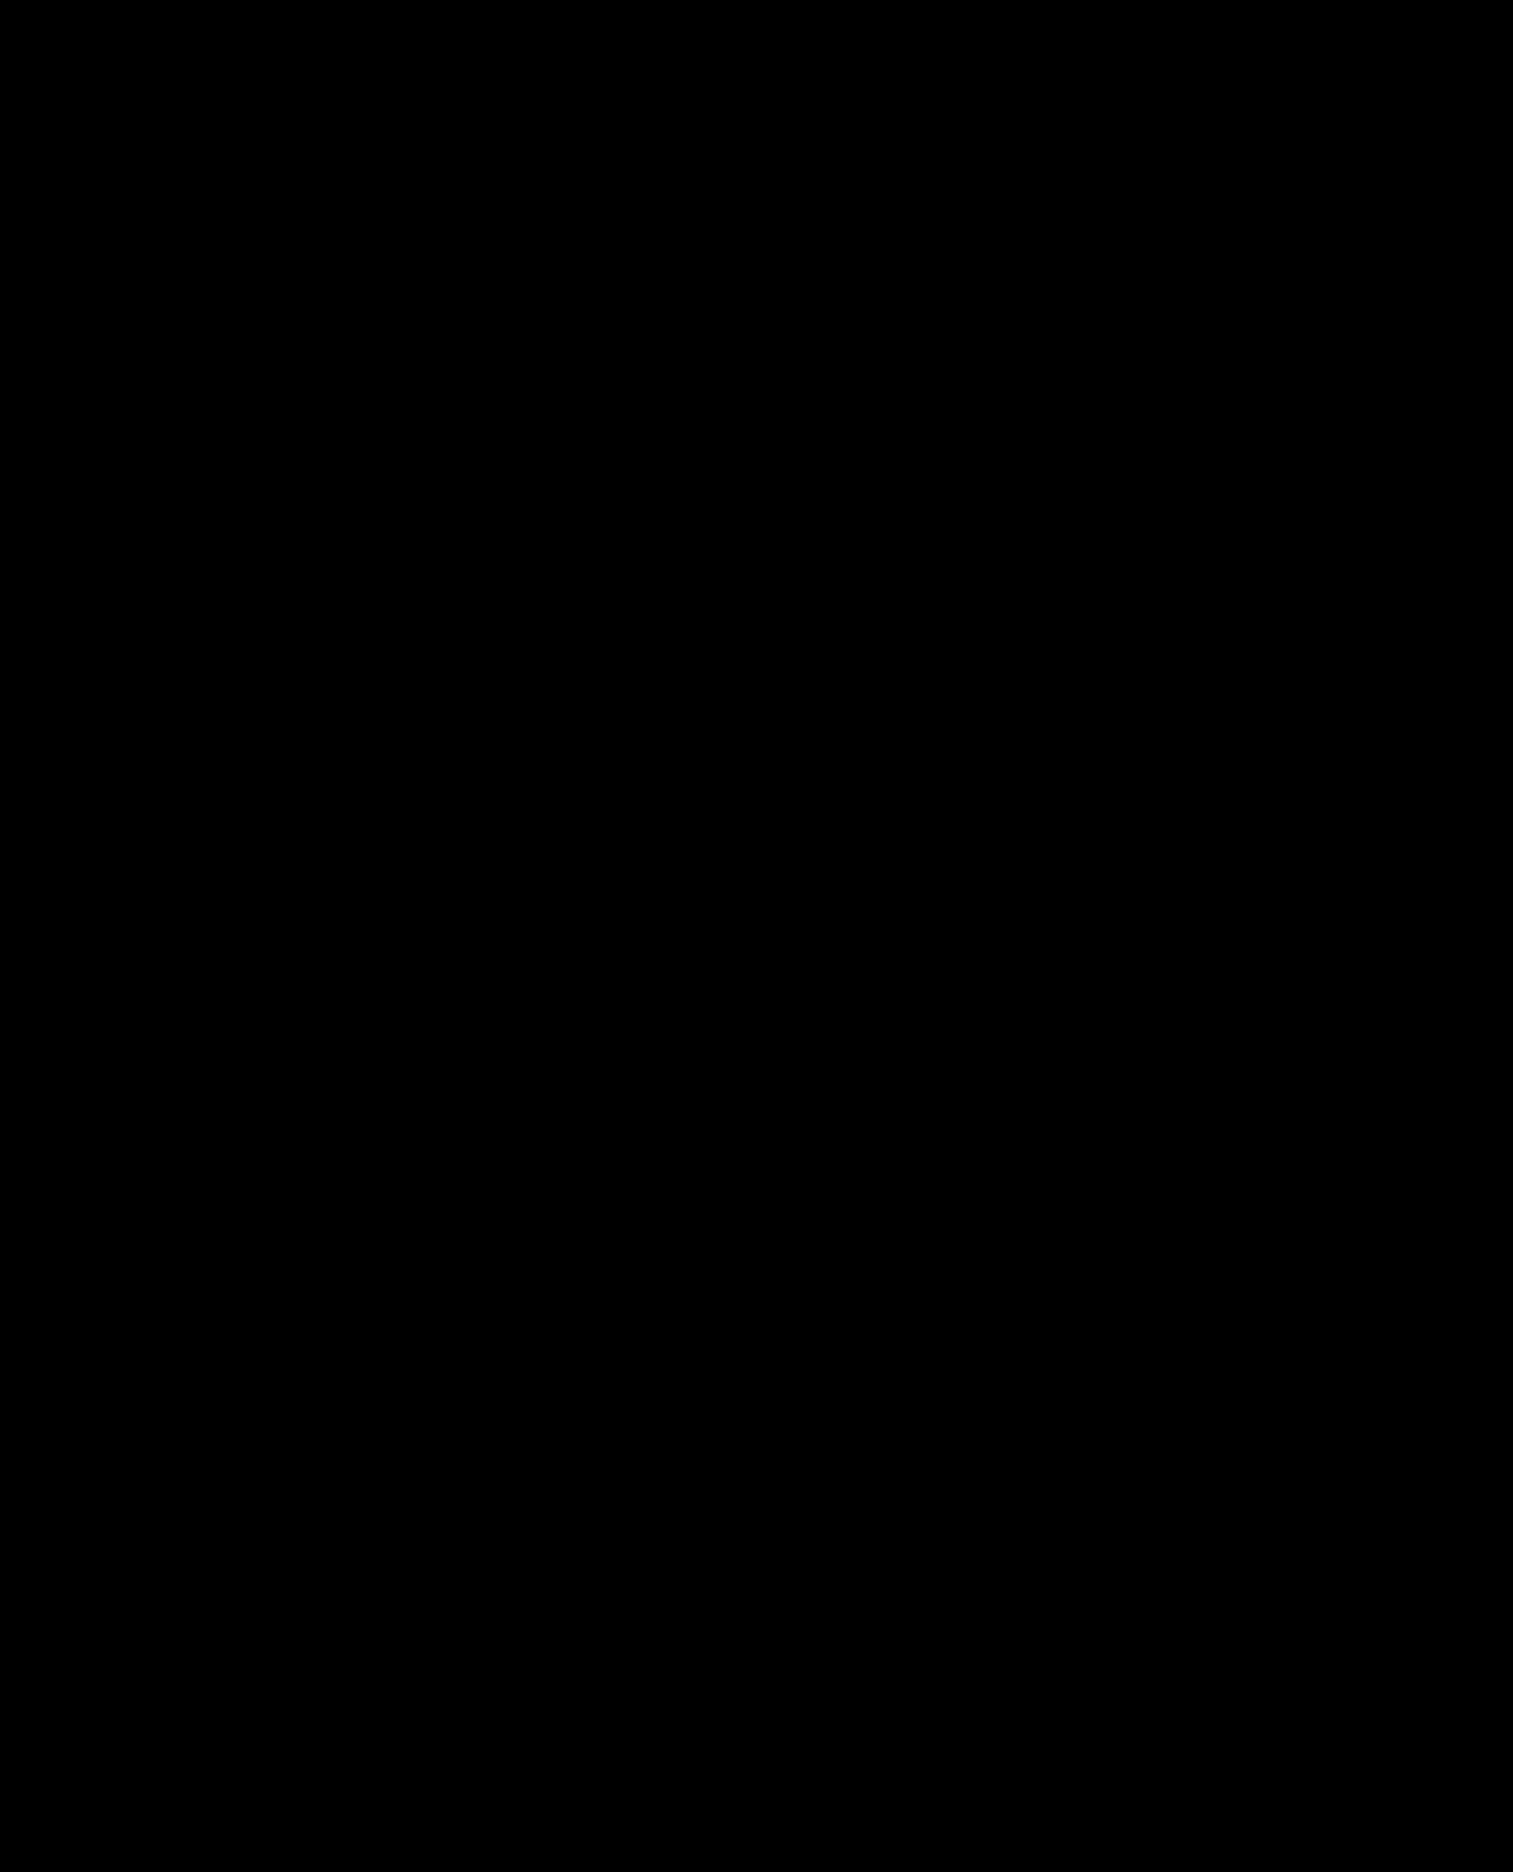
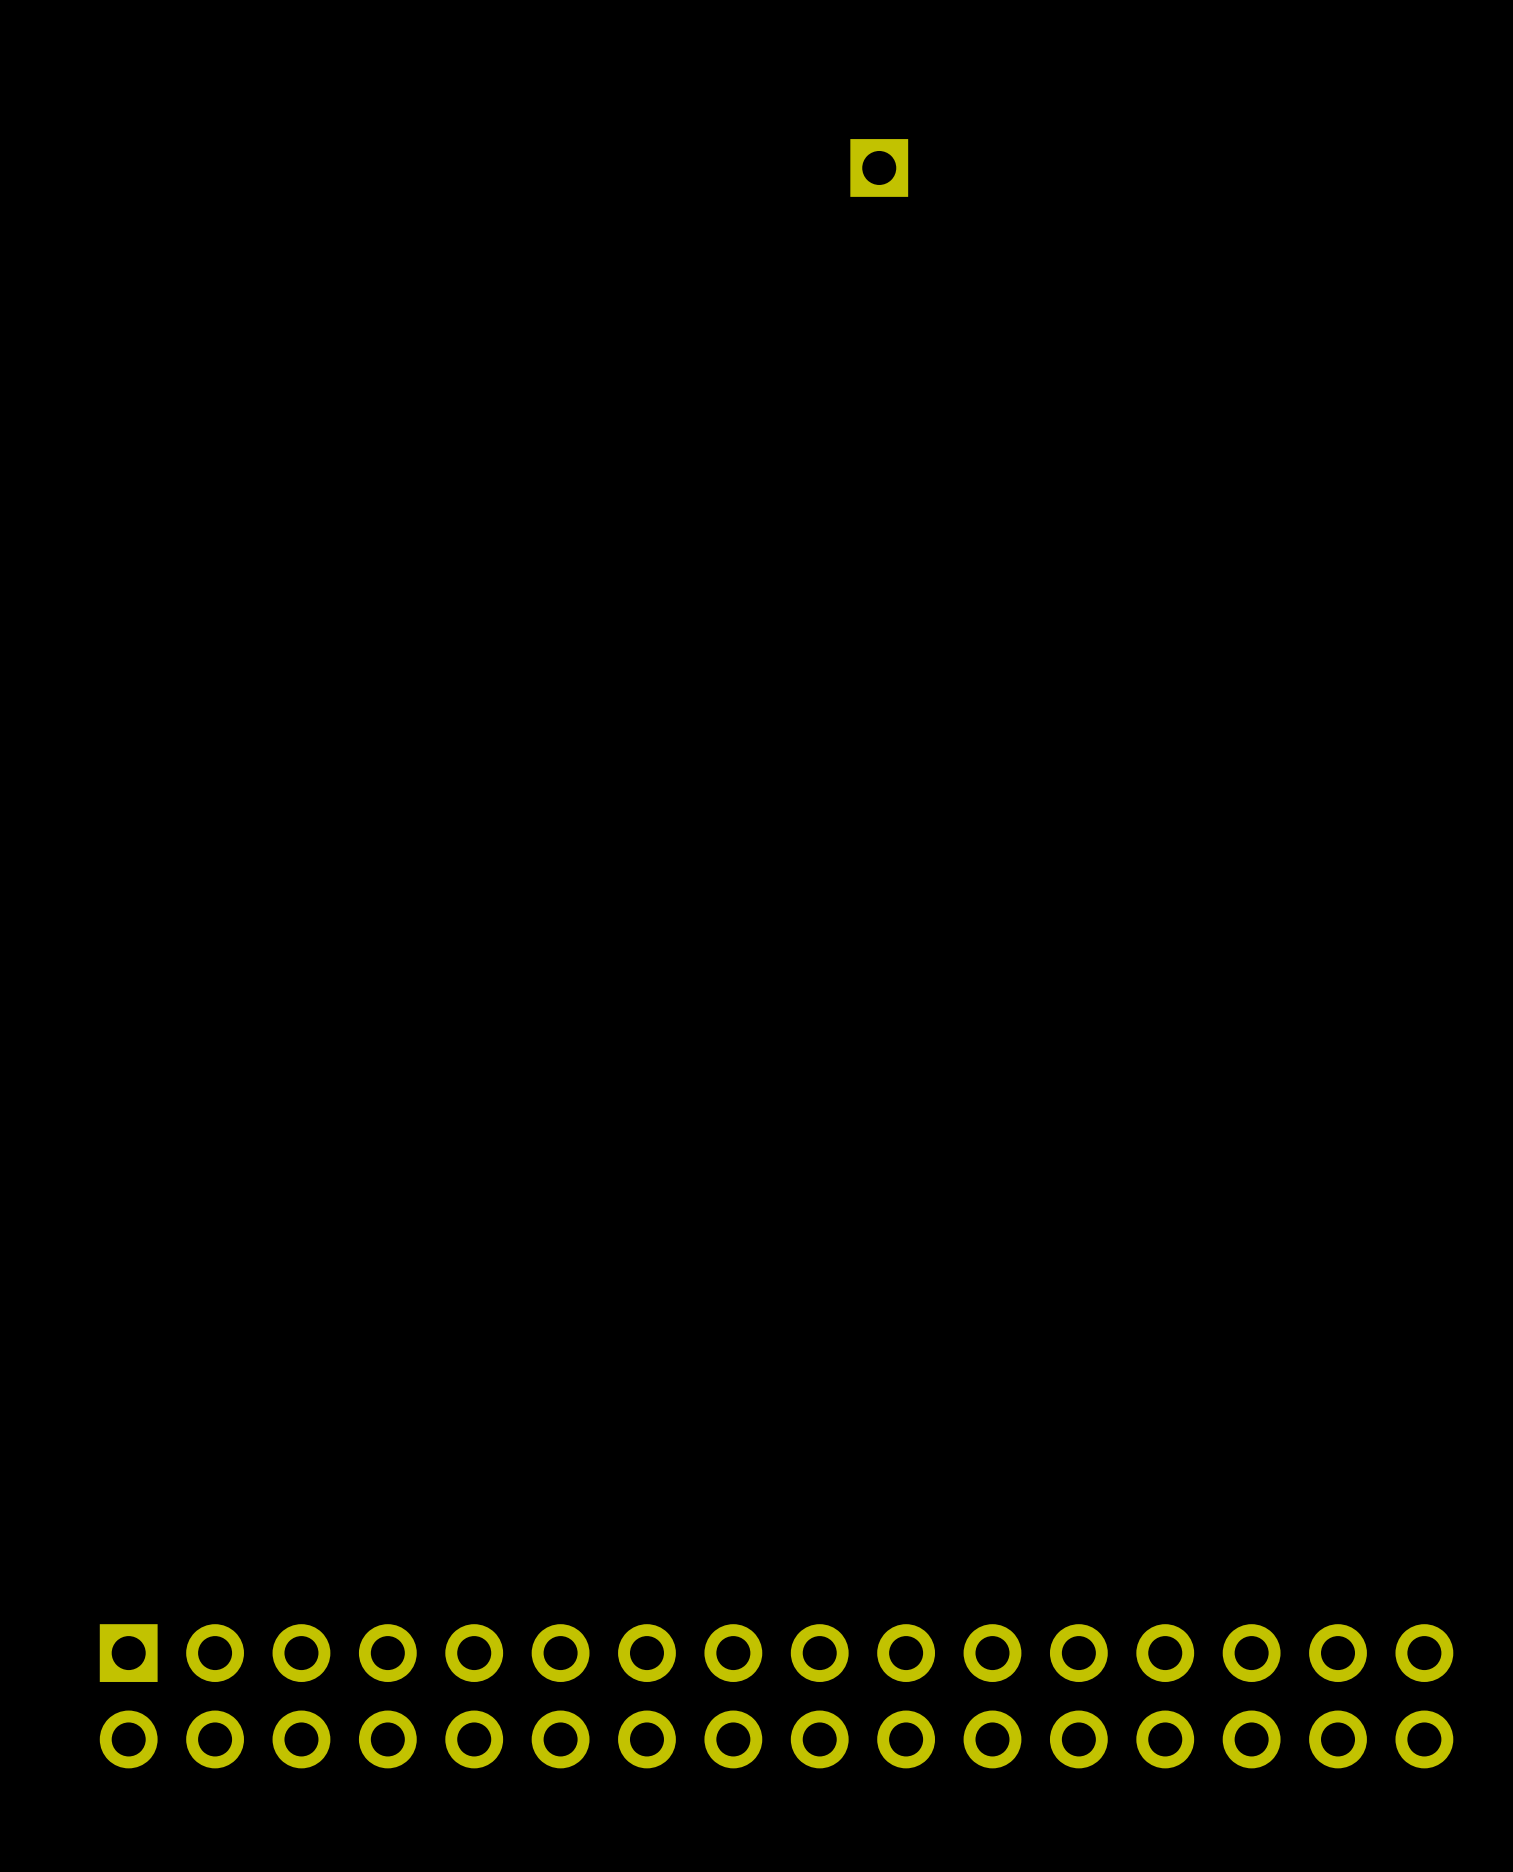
part: none -> (879, 167)
part: none -> (776, 1696)

